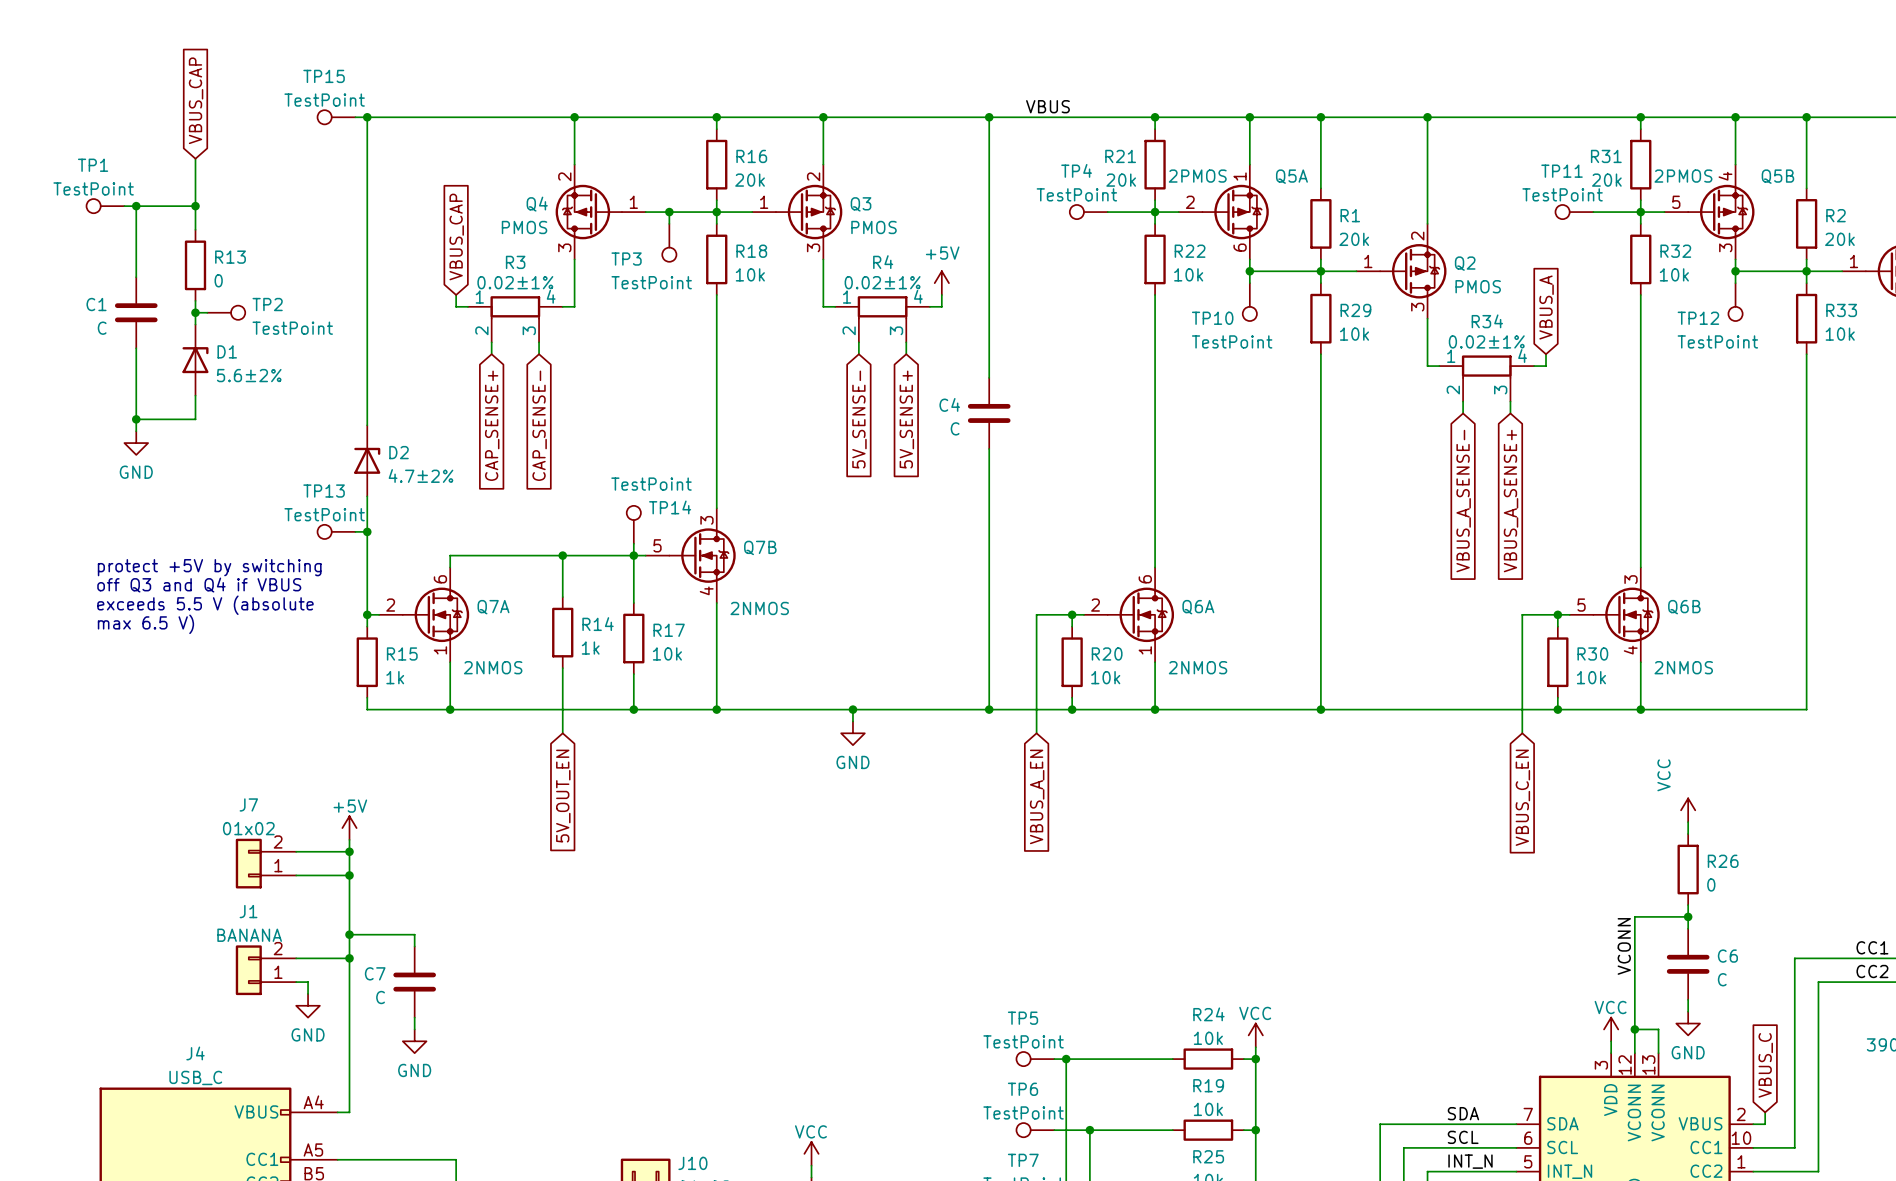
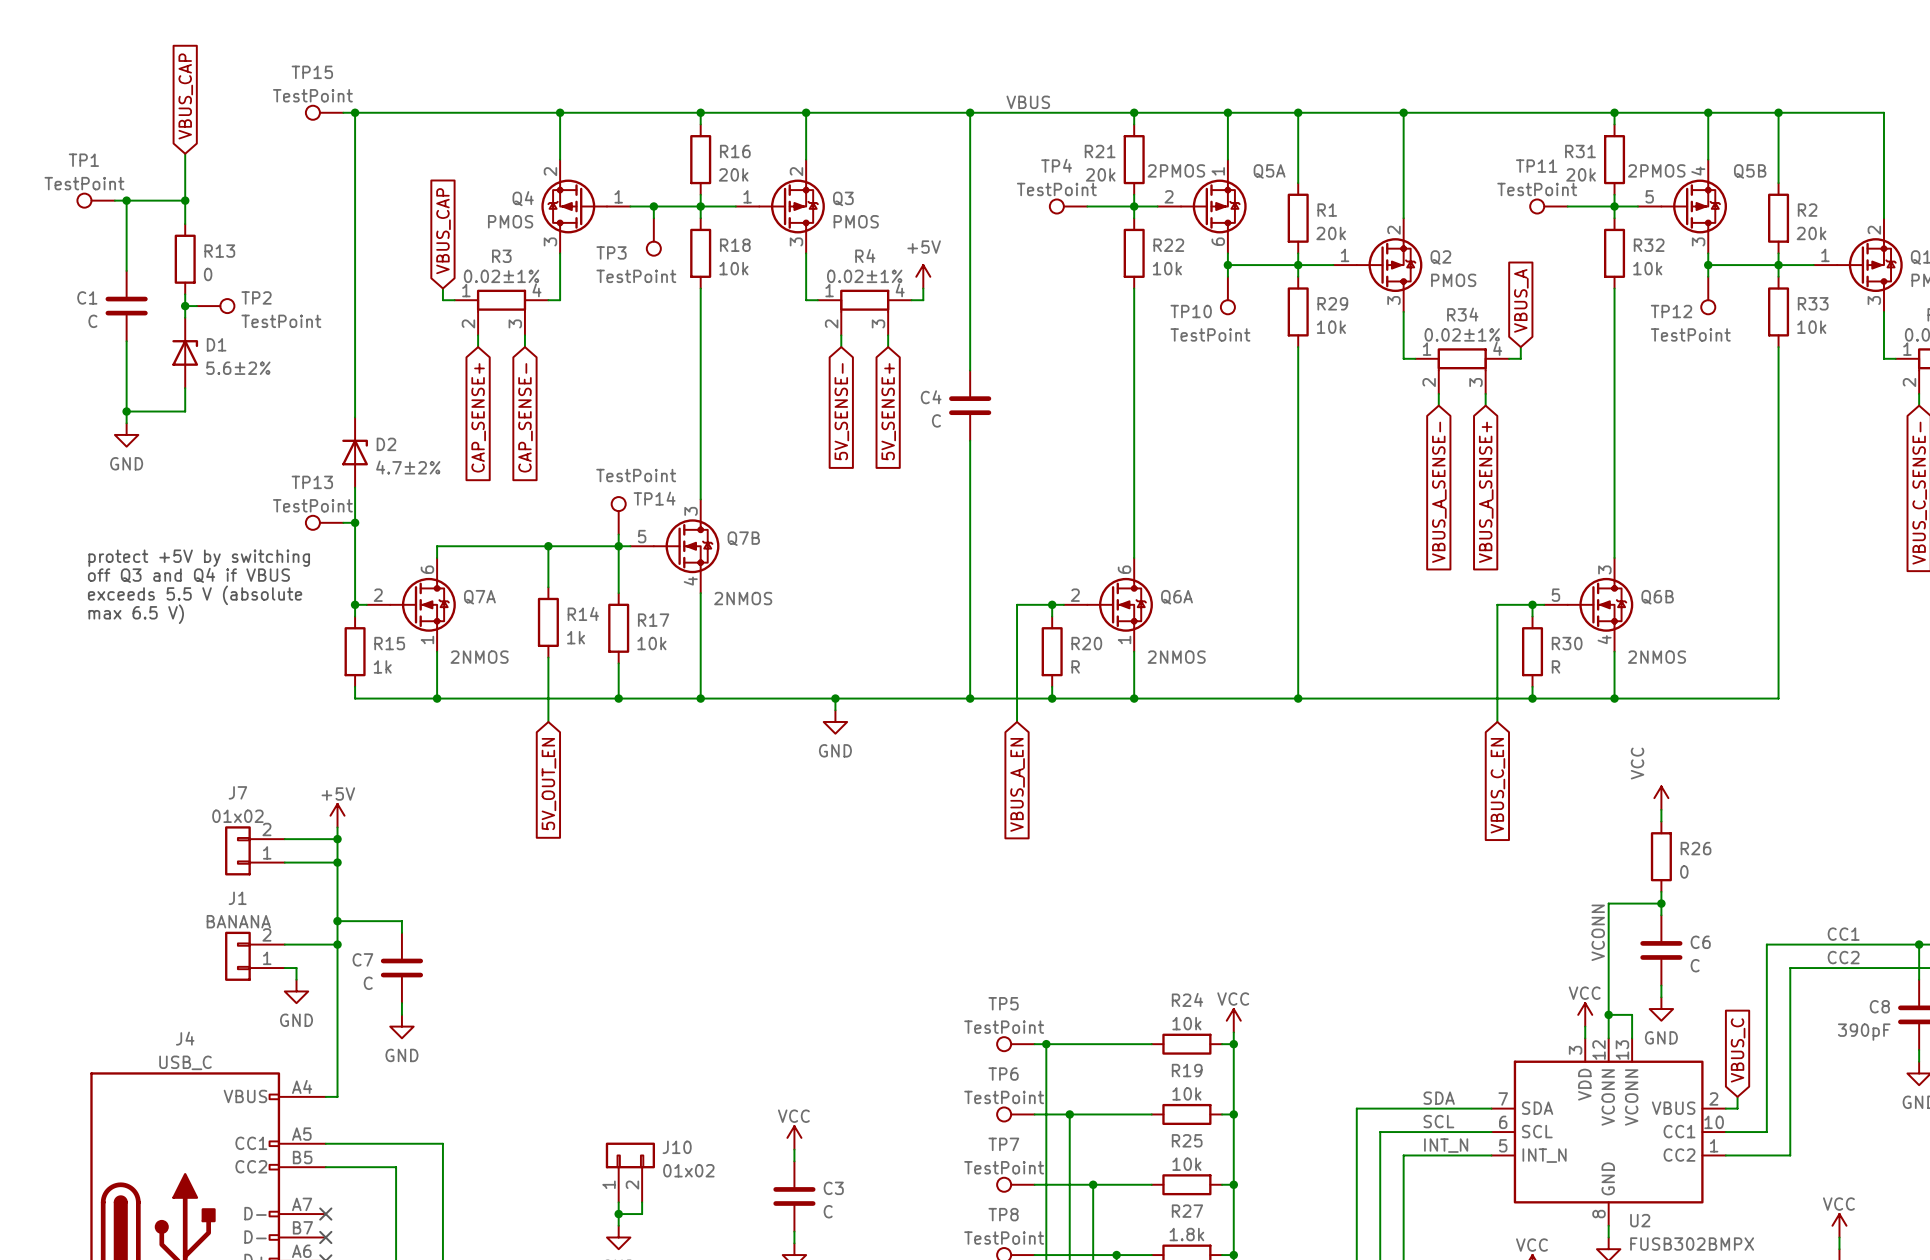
R20 value: 10k (1105, 677) -> R (1075, 666)
R30 value: 10k (1591, 677) -> R (1555, 666)

